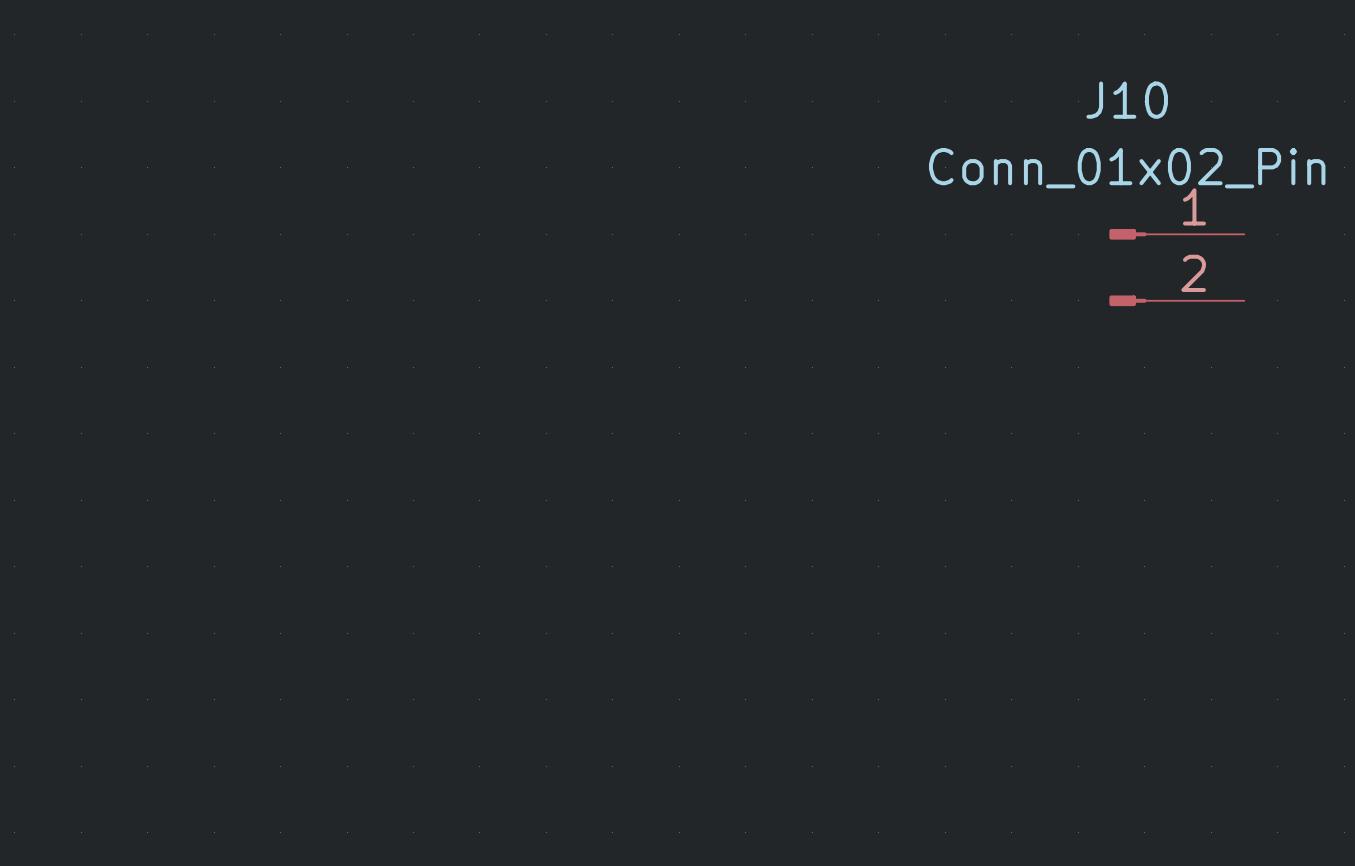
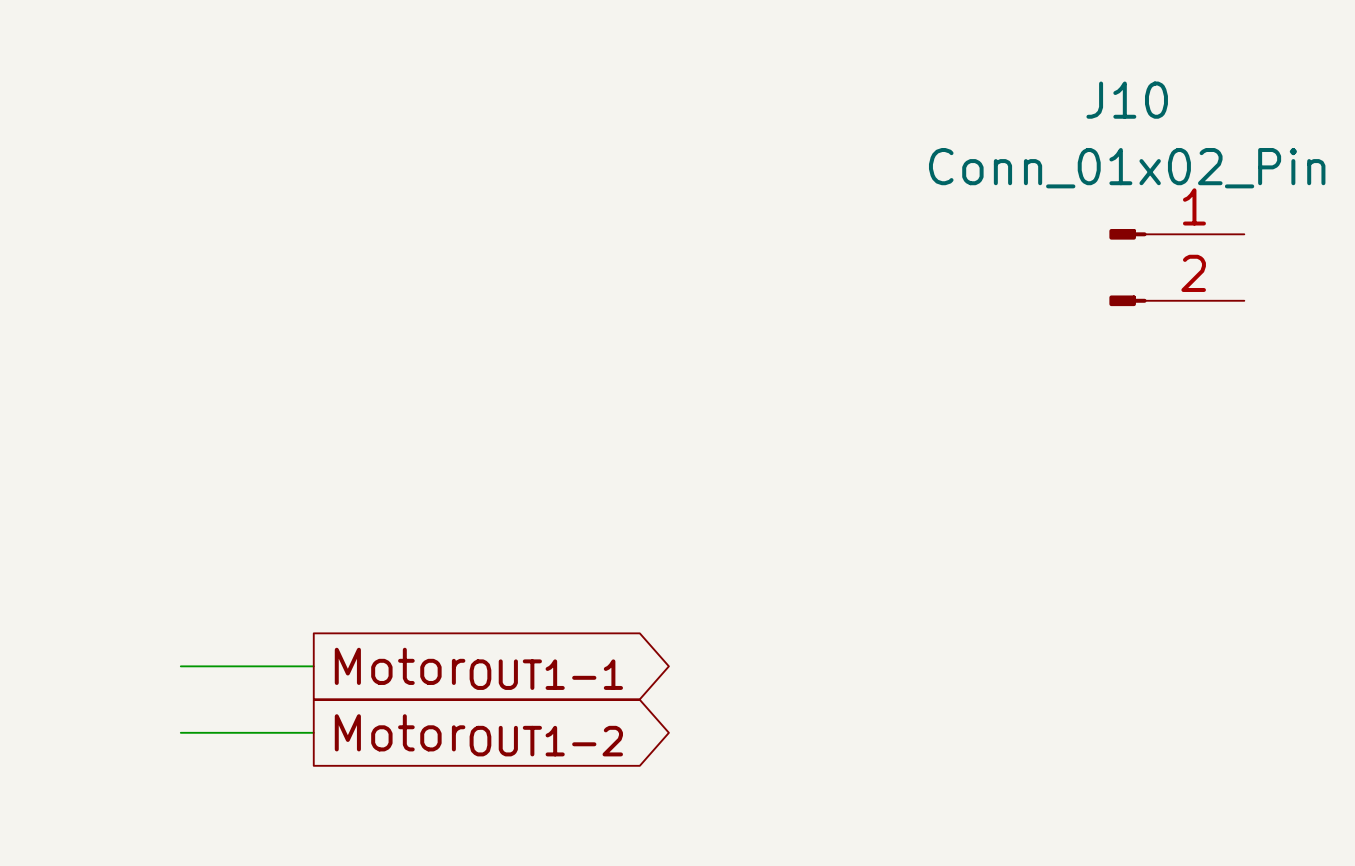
wire: none -> (180, 666) (313, 666)
global label: none -> MotorOUT1-1 (478, 668)
wire: none -> (180, 732) (313, 732)
global label: none -> MotorOUT1-2 (478, 735)

